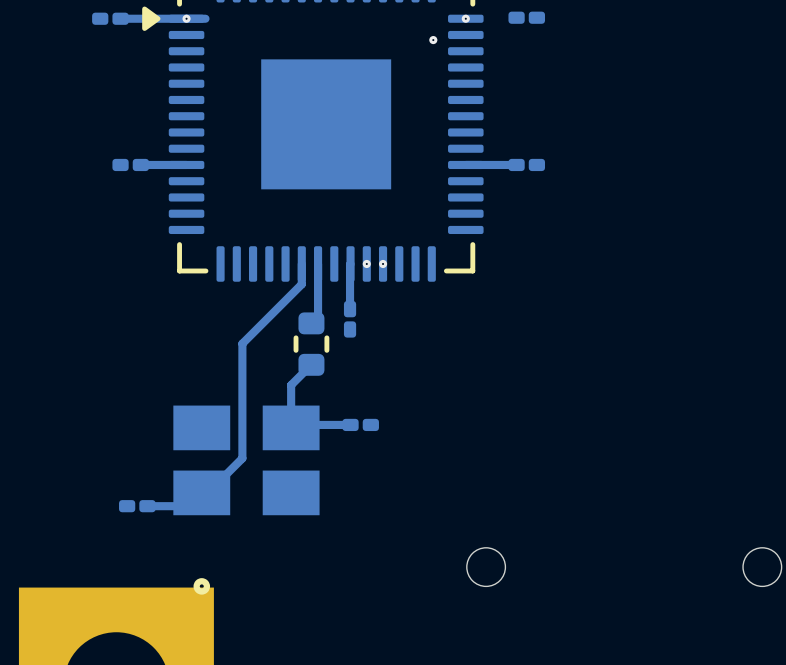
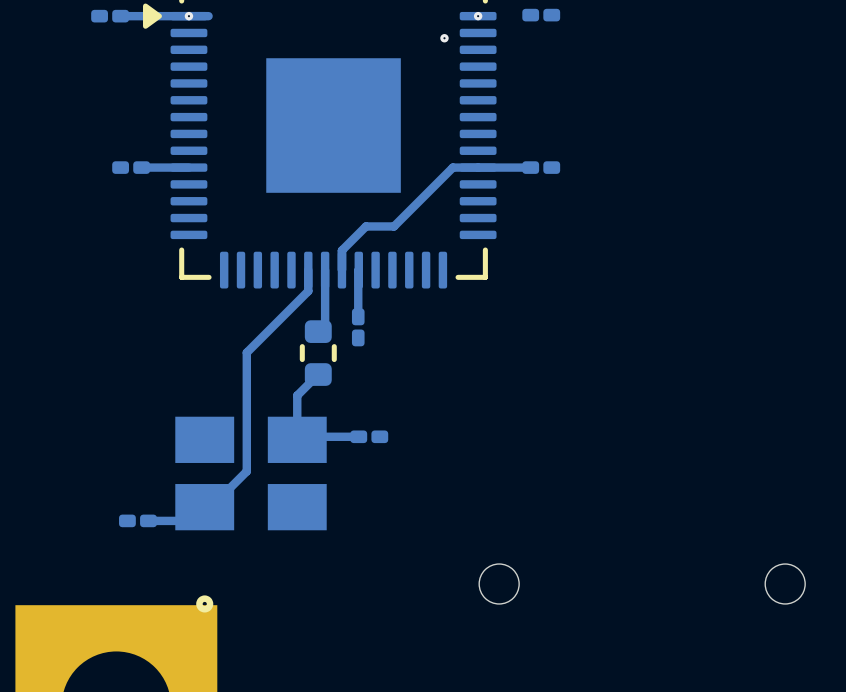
track: none -> (478, 167) (452, 167) (394, 226) (365, 226) (341, 250) (341, 270)
via: (366, 263) -> none
via: (383, 263) -> none

